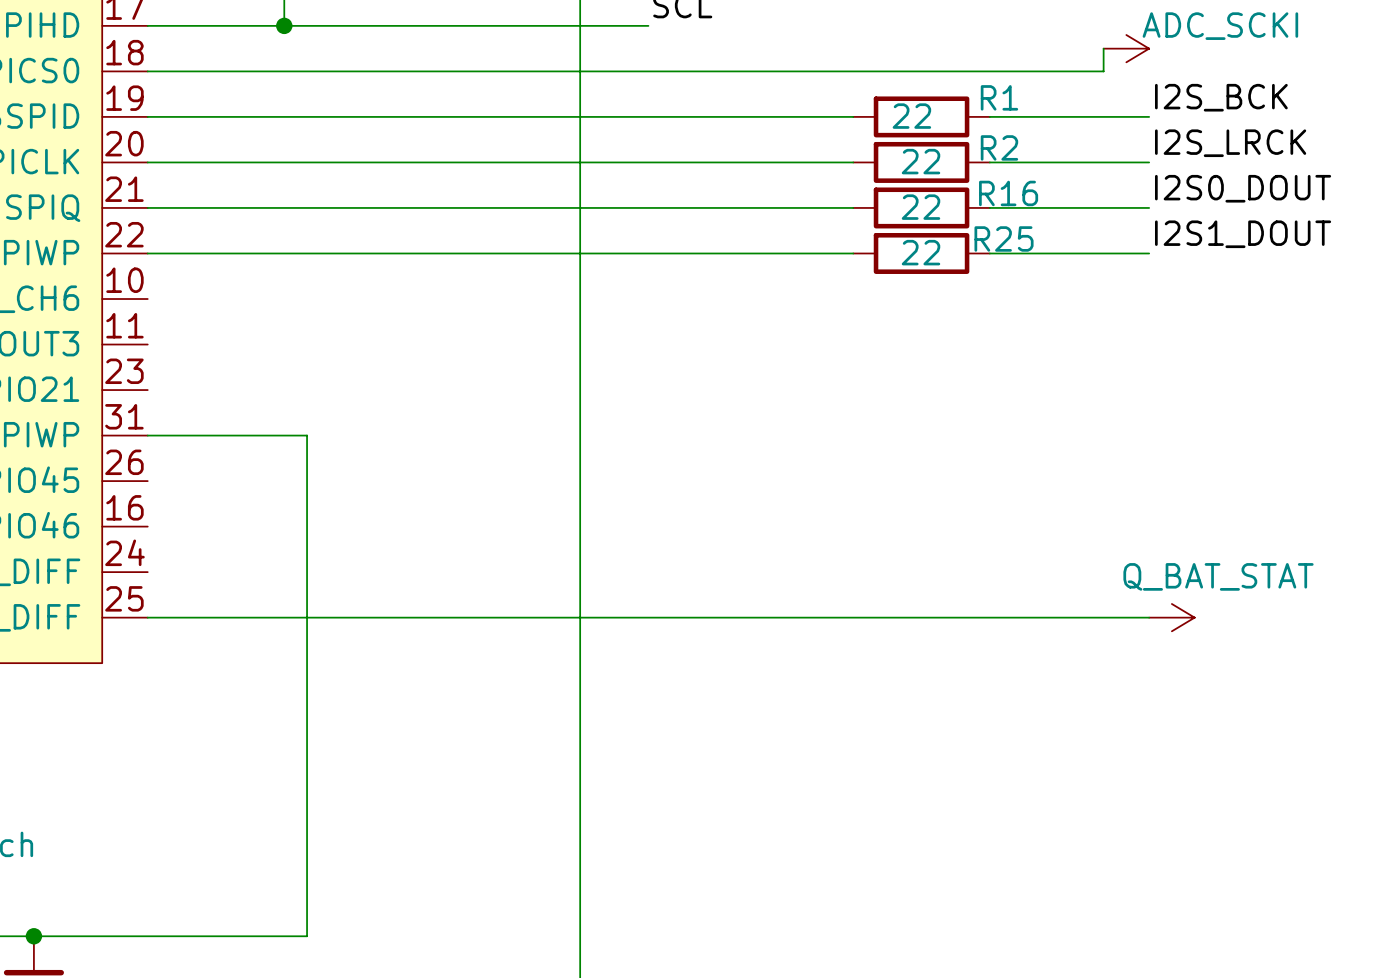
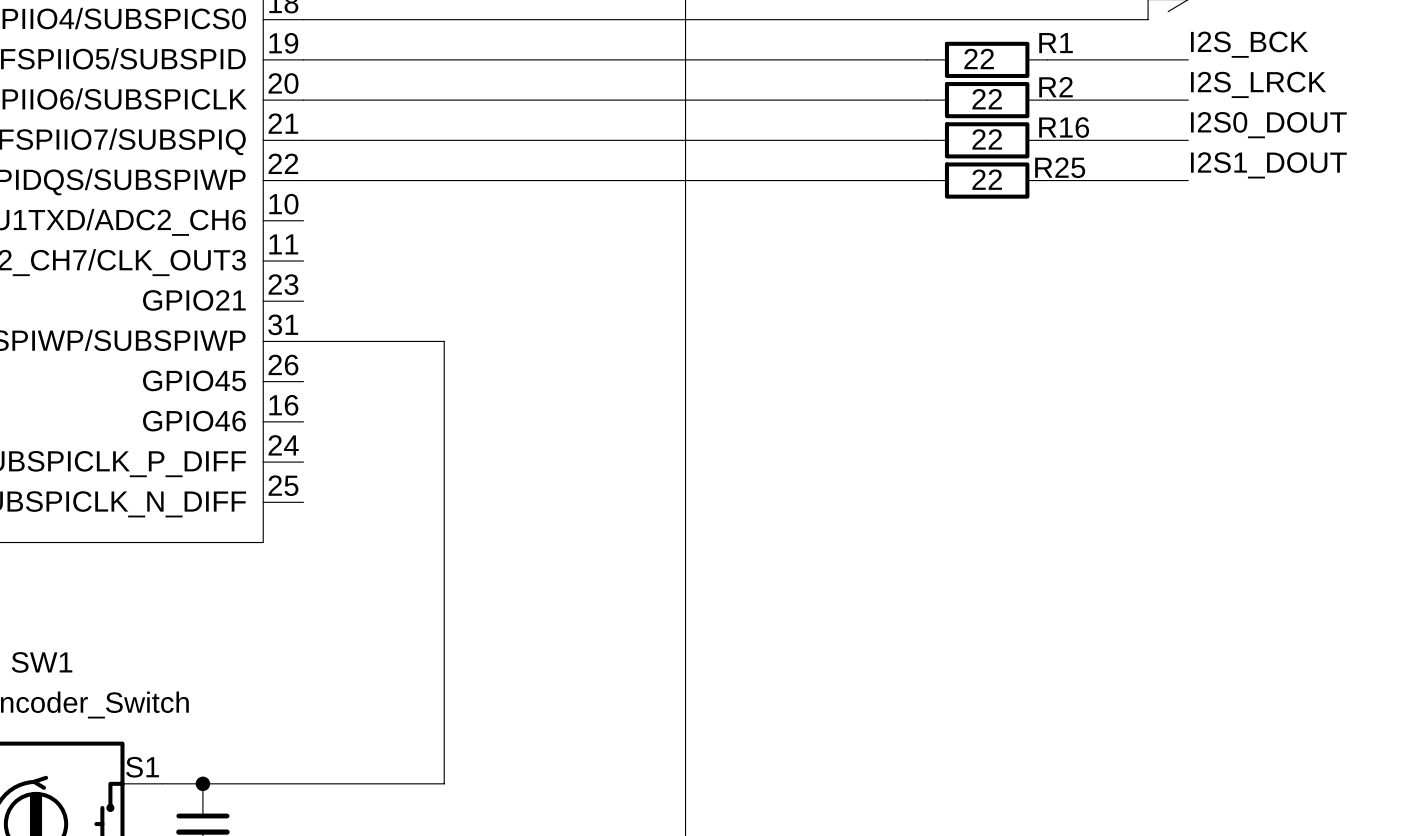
wire: (147, 617) (1149, 617) -> none
power symbol: Q_BAT_STAT (1171, 617) -> none

